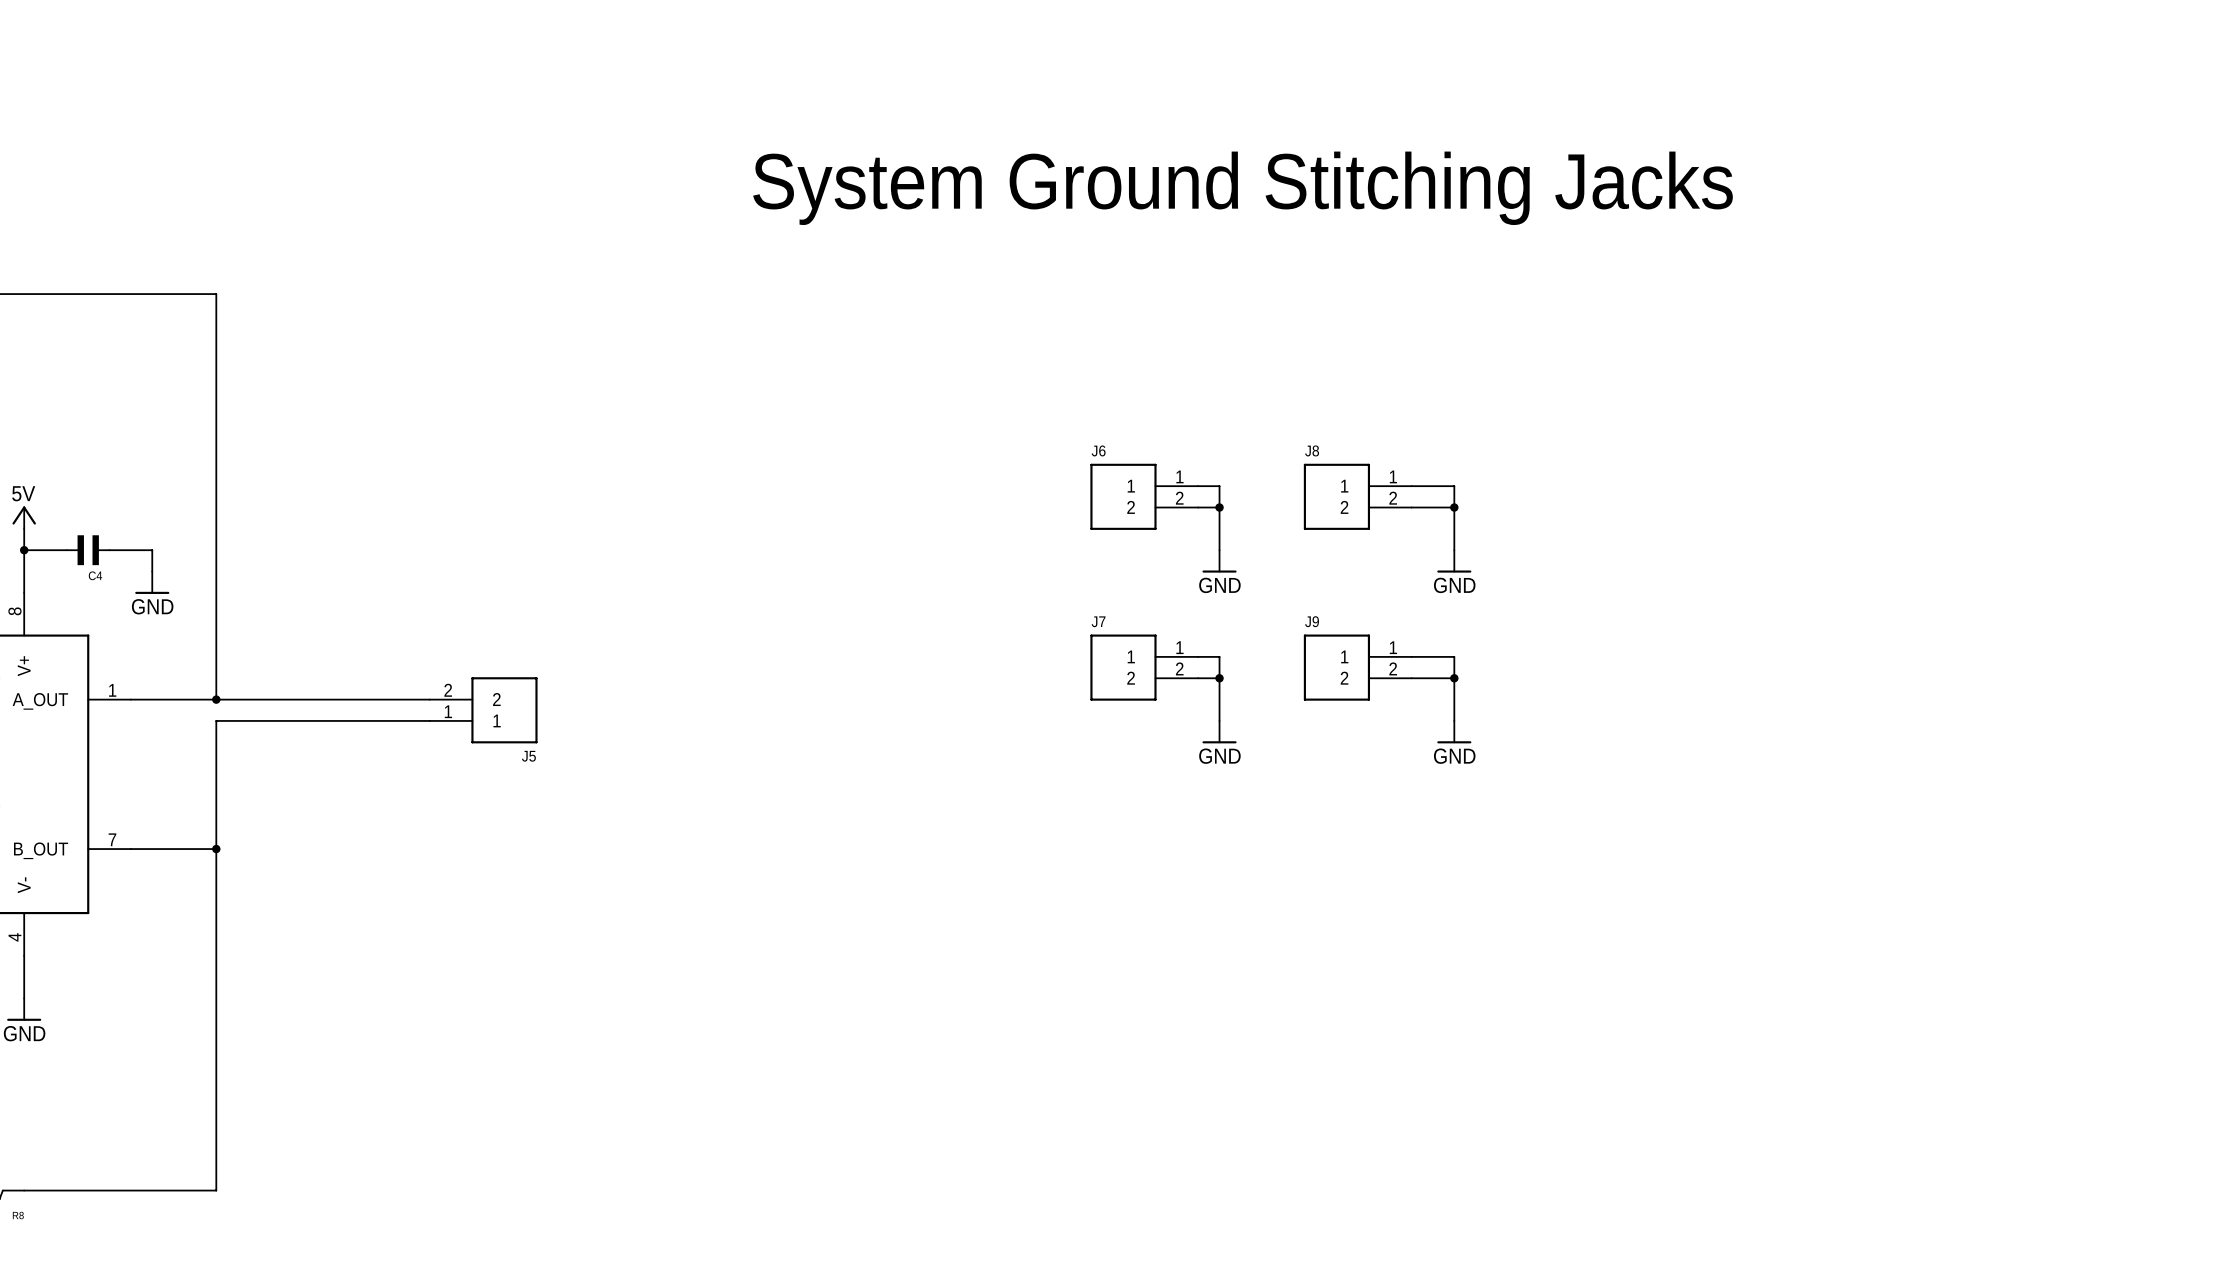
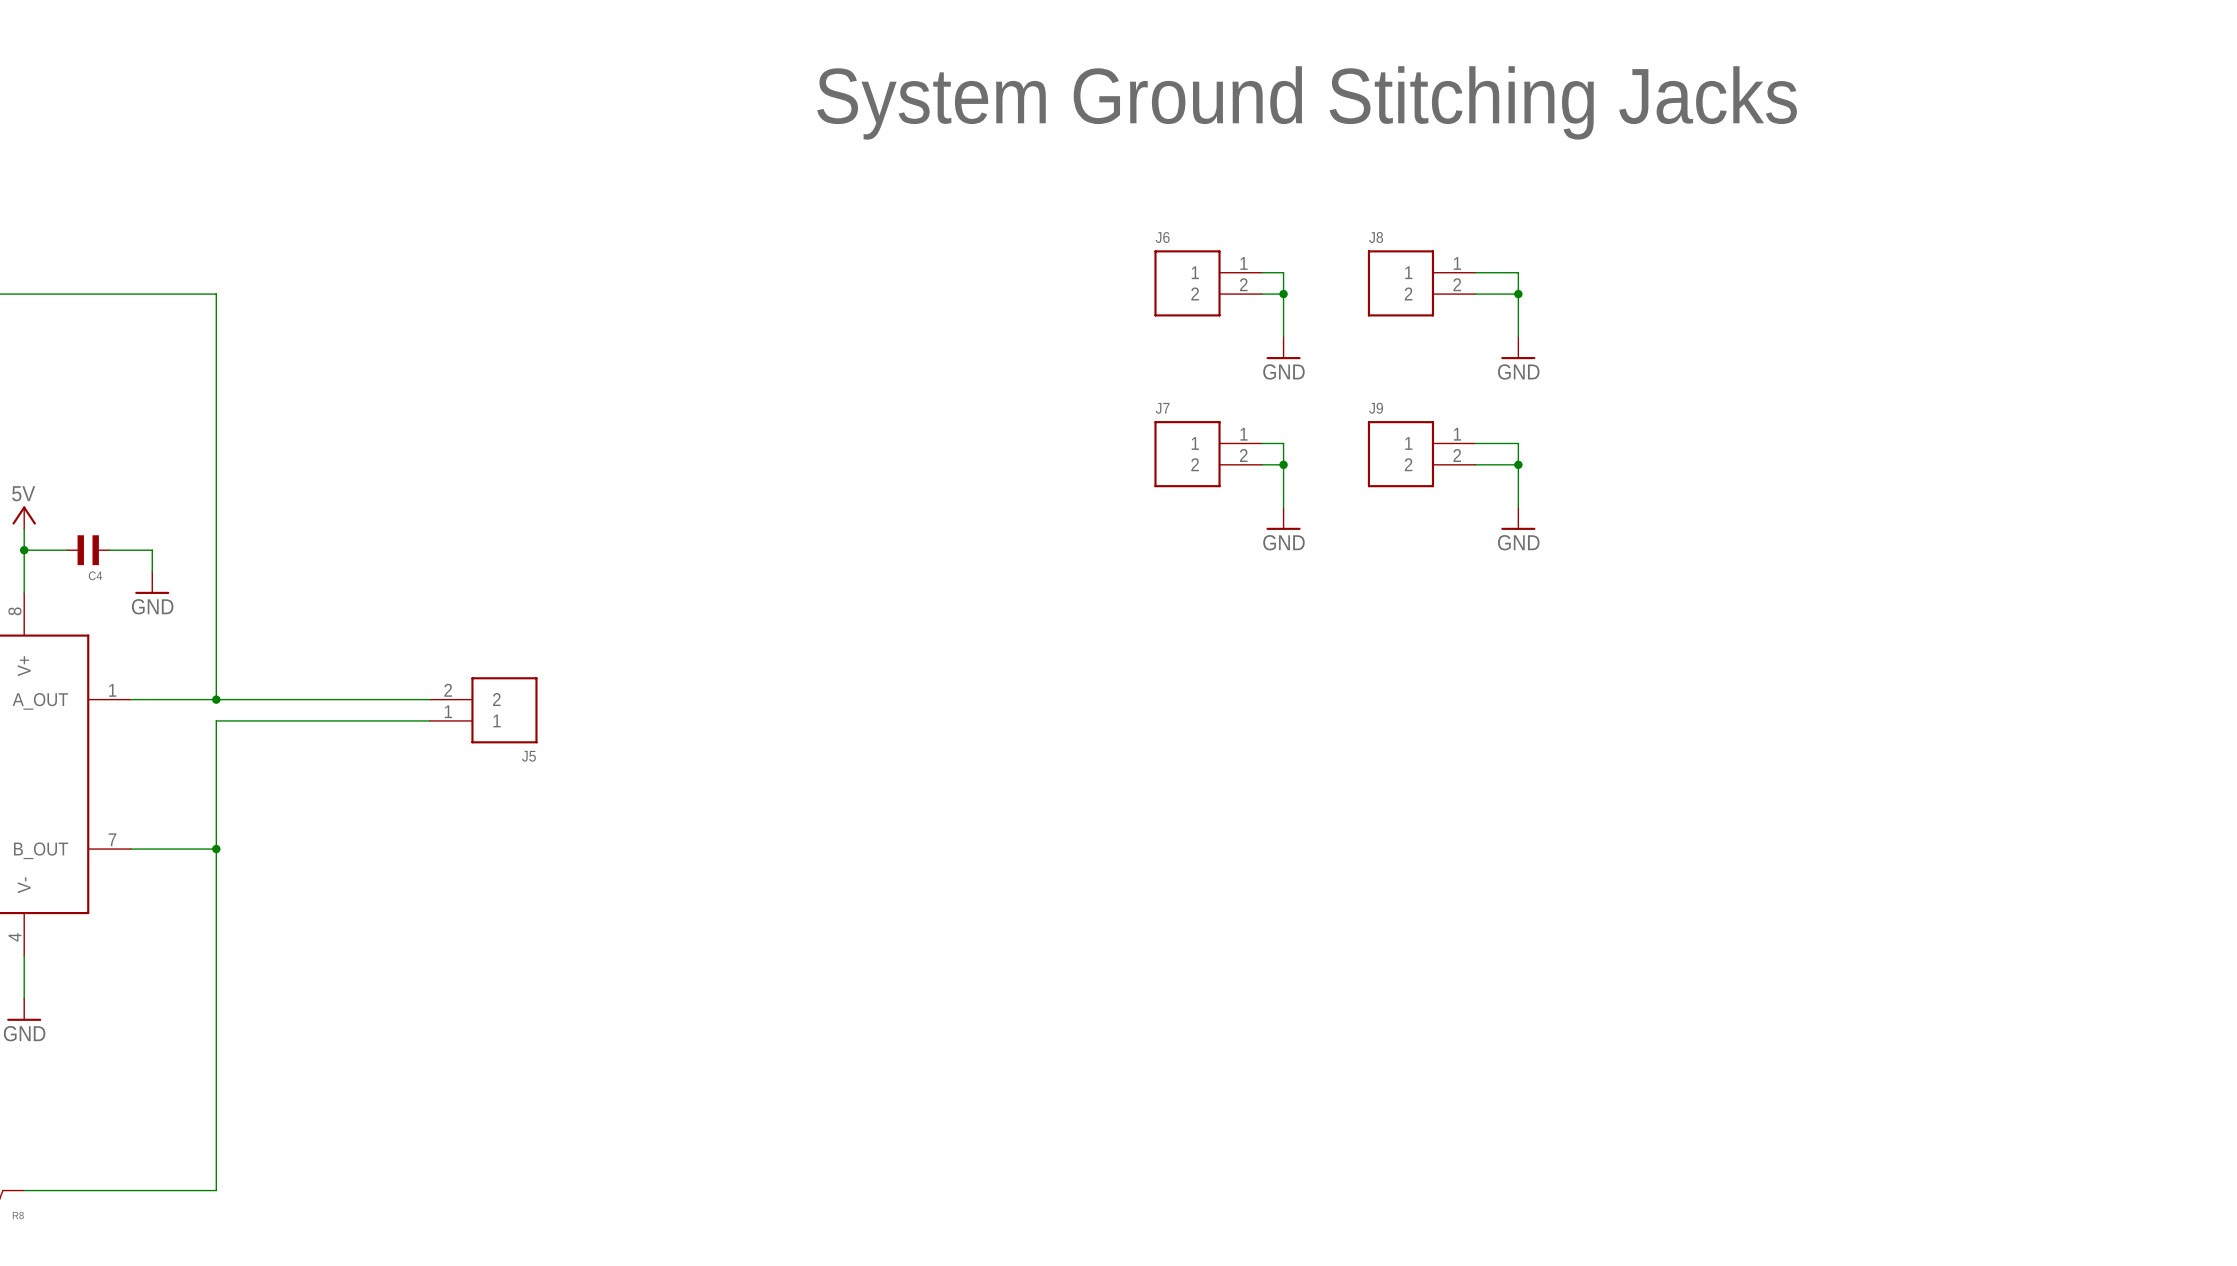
text position: System Ground Stitching Jacks (1243, 188) -> System Ground Stitching Jacks (1307, 102)
wire: none -> (1262, 272) (1283, 272) (1283, 336)
wire: none -> (1475, 272) (1518, 272) (1518, 336)
wire: none -> (1262, 294) (1283, 294)
junction: none -> (1283, 294)
wire: none -> (1475, 294) (1518, 294)
junction: none -> (1518, 294)
power symbol: none -> (1283, 347)
power symbol: none -> (1518, 347)
junction: none -> (1283, 464)
junction: none -> (1518, 464)
wire: (1198, 486) (1219, 486) (1219, 550) -> (1262, 443) (1283, 443) (1283, 507)
wire: (1411, 486) (1454, 486) (1454, 550) -> (1475, 443) (1518, 443) (1518, 507)
J6 position: (1144, 496) -> (1208, 283)
J8 position: (1357, 496) -> (1421, 283)
wire: (1198, 507) (1219, 507) -> (1262, 464) (1283, 464)
junction: (1219, 507) -> none
wire: (1411, 507) (1454, 507) -> (1475, 464) (1518, 464)
junction: (1454, 507) -> none
power symbol position: (1219, 561) -> (1283, 518)
power symbol position: (1454, 561) -> (1518, 518)
wire: (1198, 656) (1219, 656) (1219, 720) -> none
wire: (1411, 656) (1454, 656) (1454, 720) -> none
J7 position: (1144, 667) -> (1208, 454)
J9 position: (1357, 667) -> (1421, 454)
wire: (1198, 678) (1219, 678) -> none
junction: (1219, 678) -> none
wire: (1411, 678) (1454, 678) -> none
junction: (1454, 678) -> none
power symbol: (1219, 732) -> none
power symbol: (1454, 732) -> none

